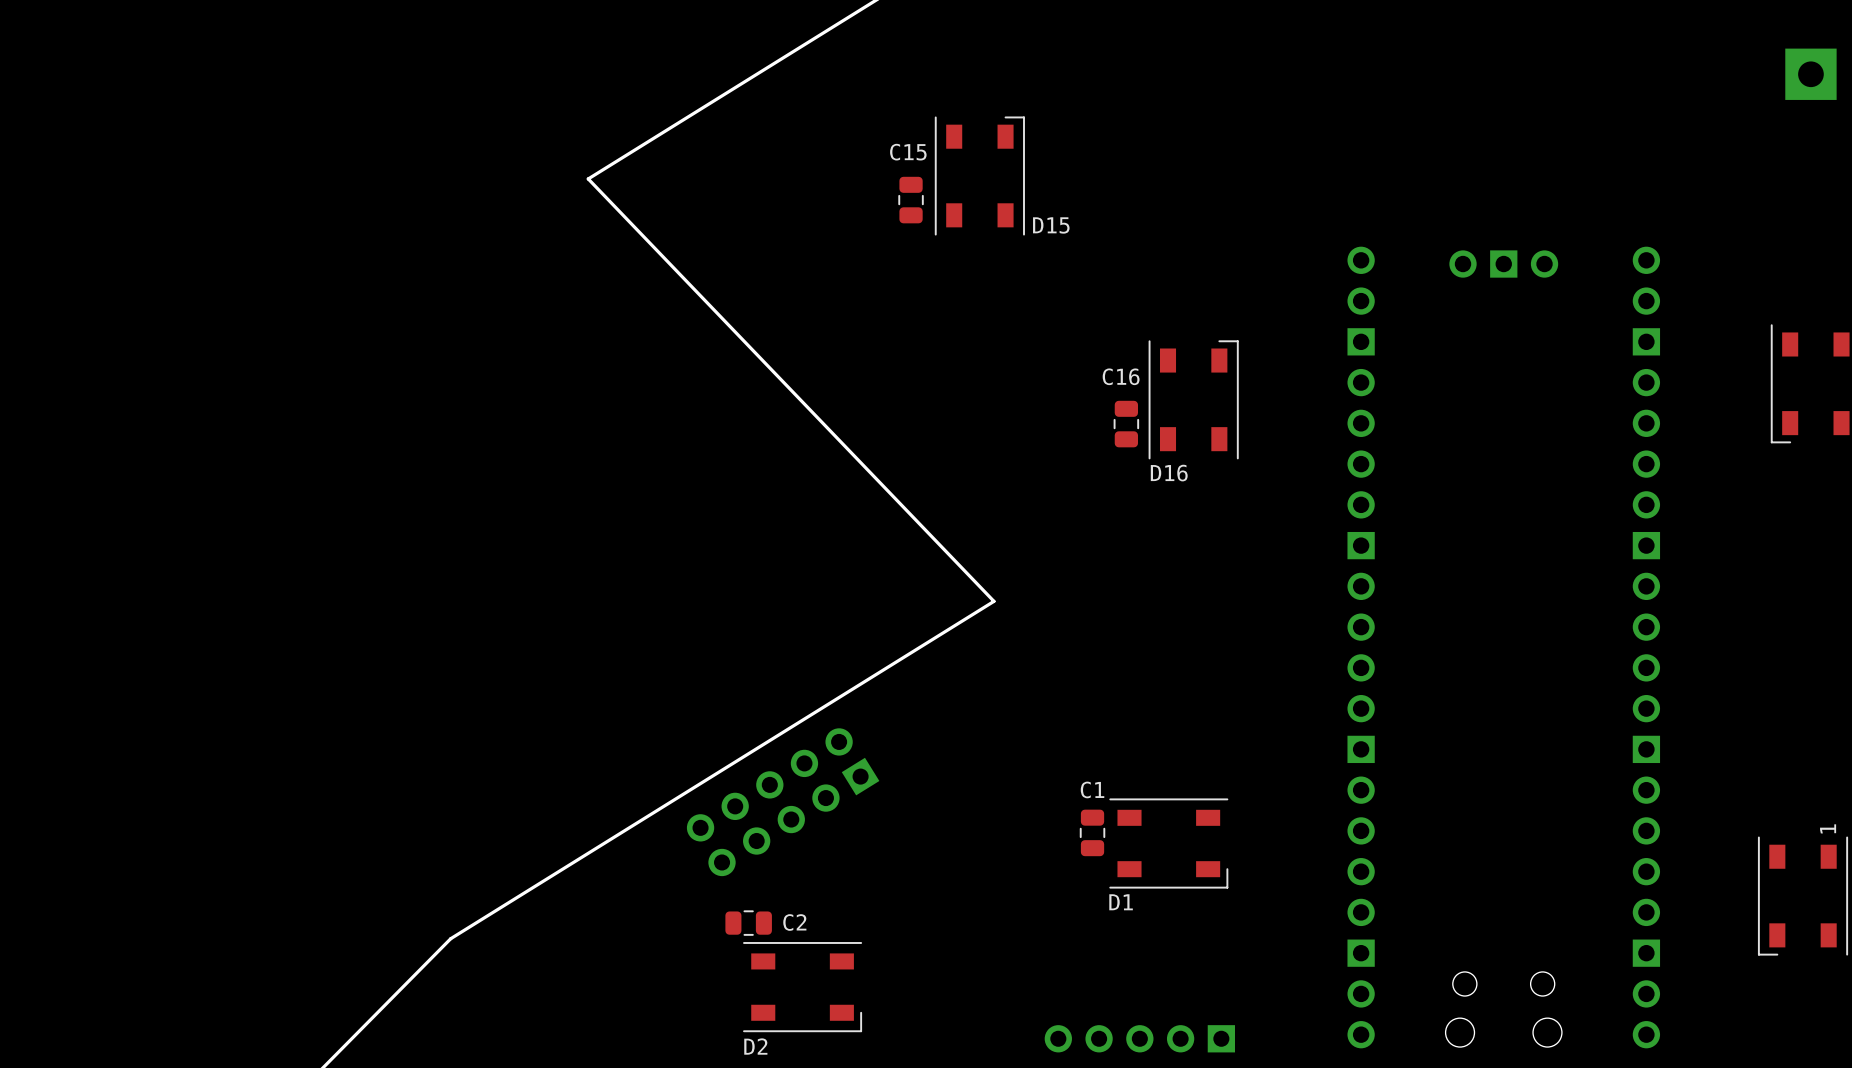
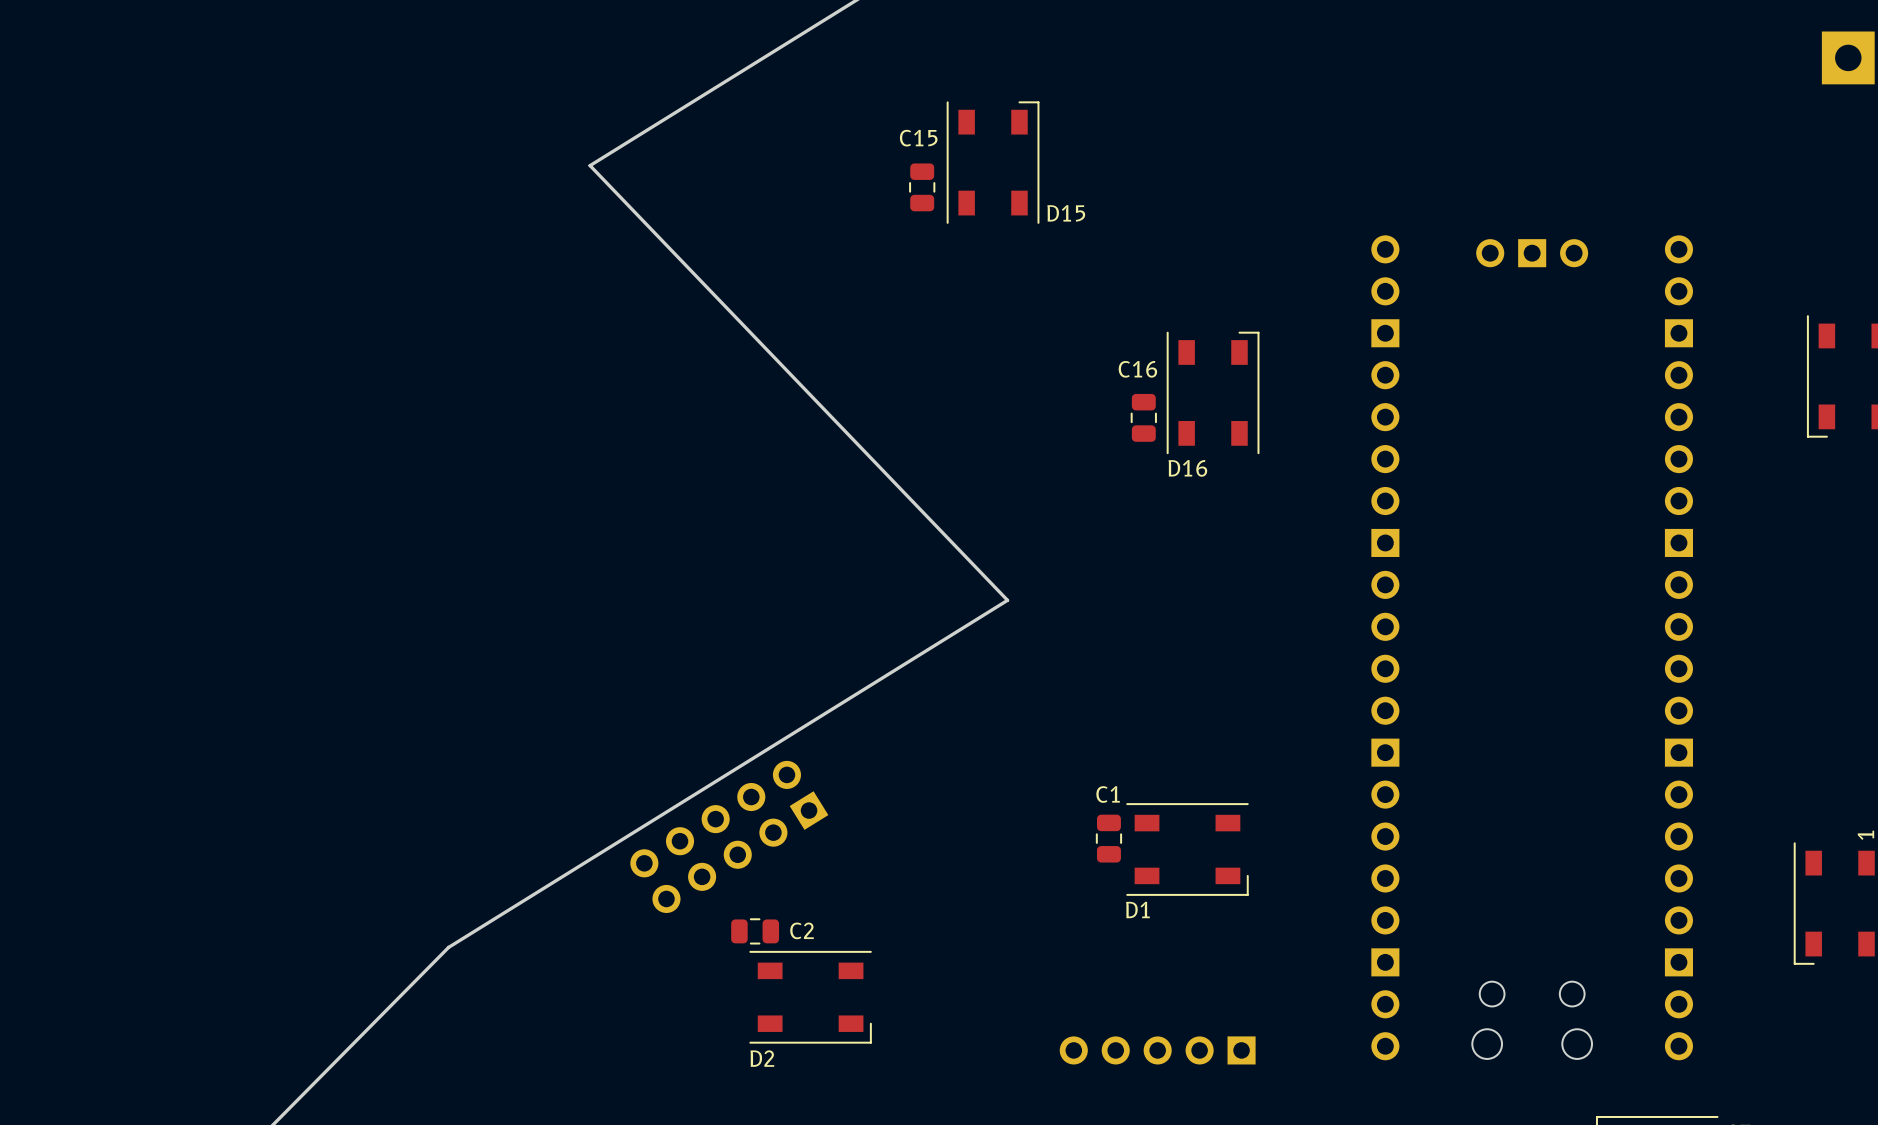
part position: (783, 802) -> (729, 836)

